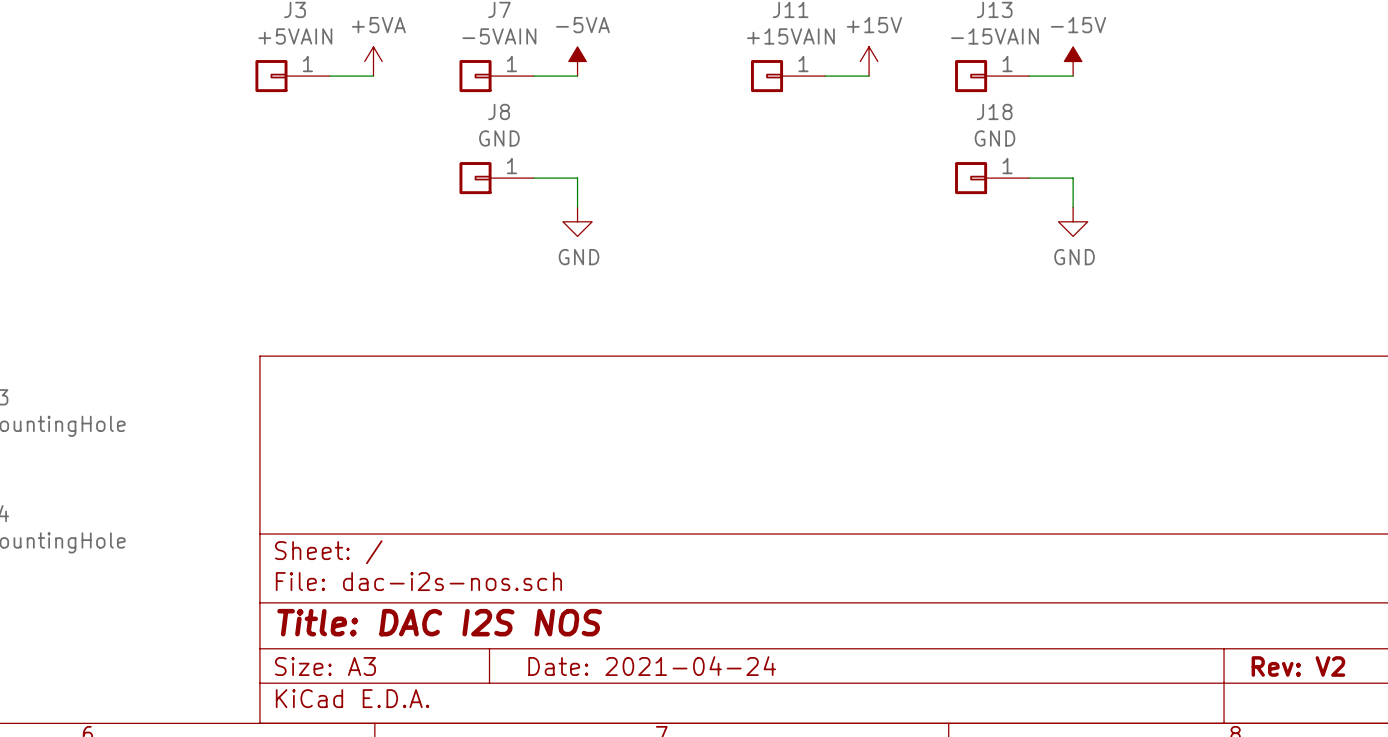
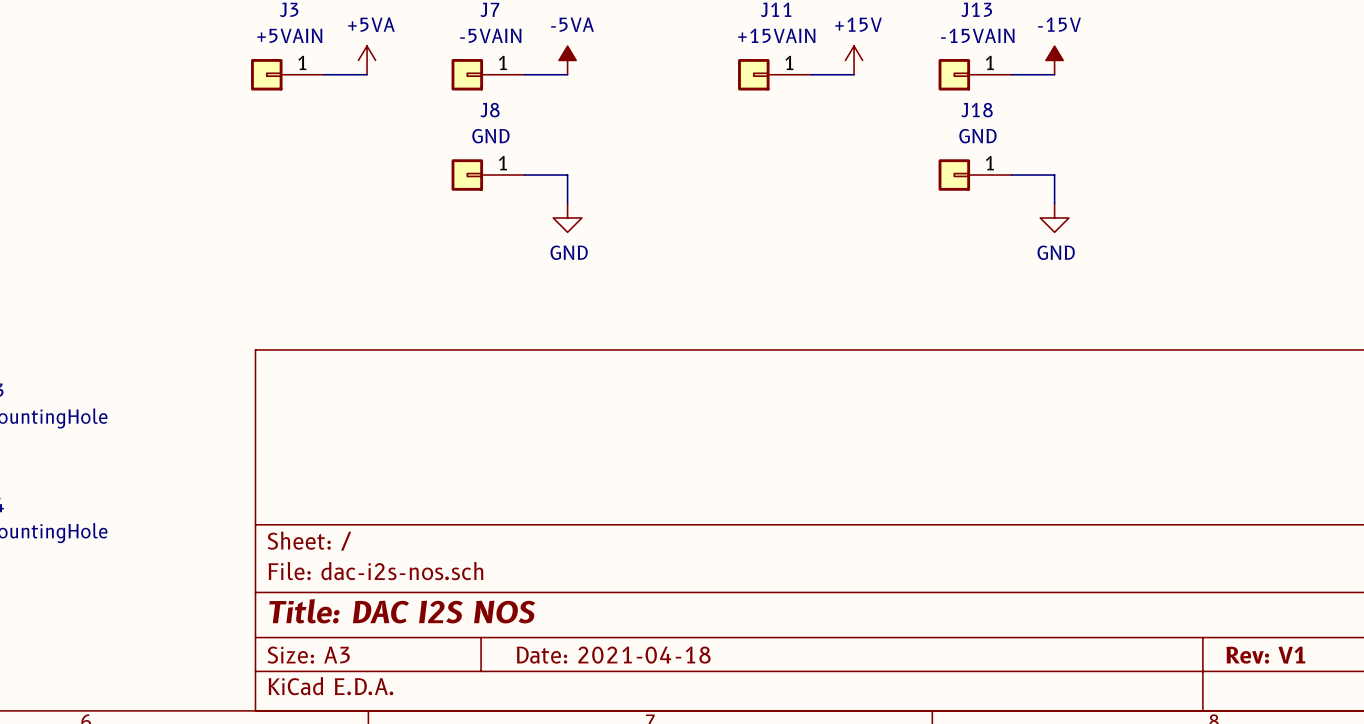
title block: Date: 2021-04-24 (652, 666) -> Date: 2021-04-18 (613, 655)
title block: Rev: V2 (1298, 666) -> Rev: V1 (1265, 655)

